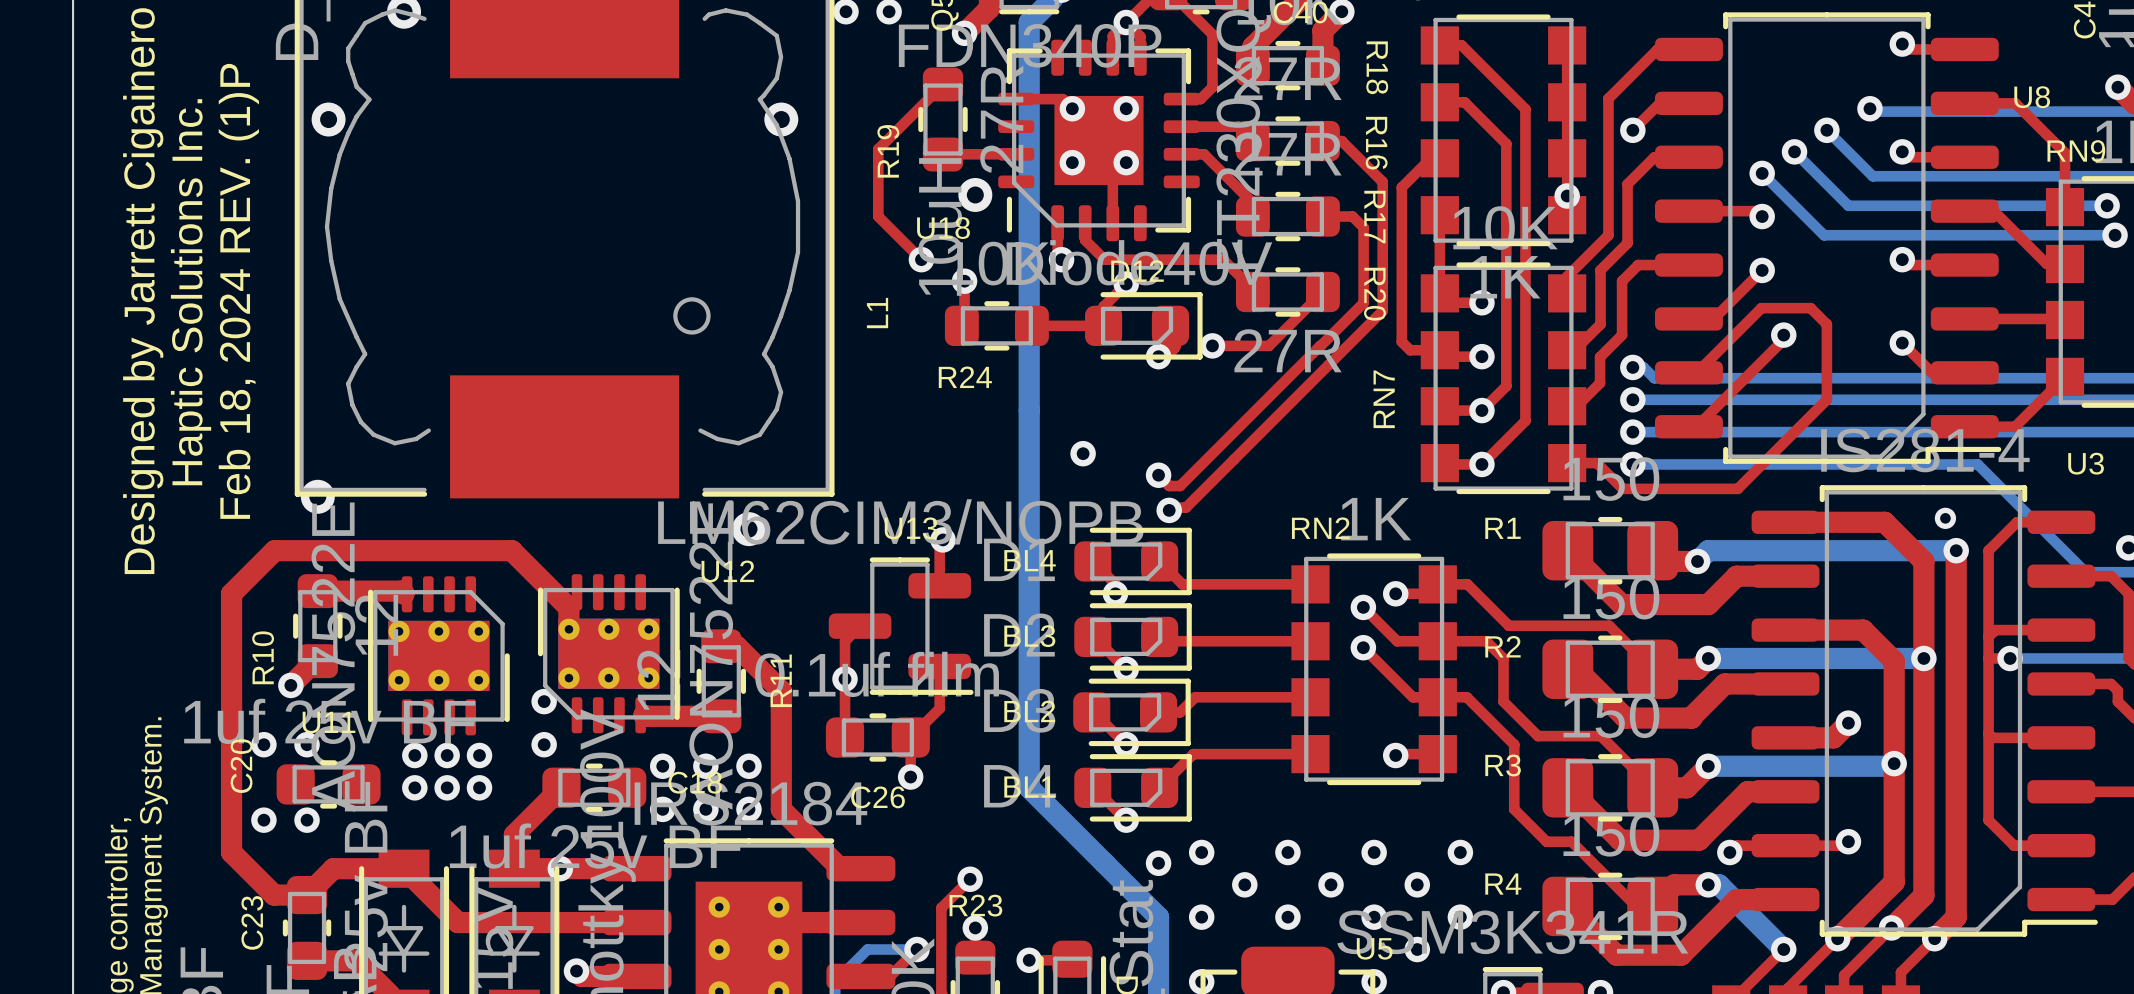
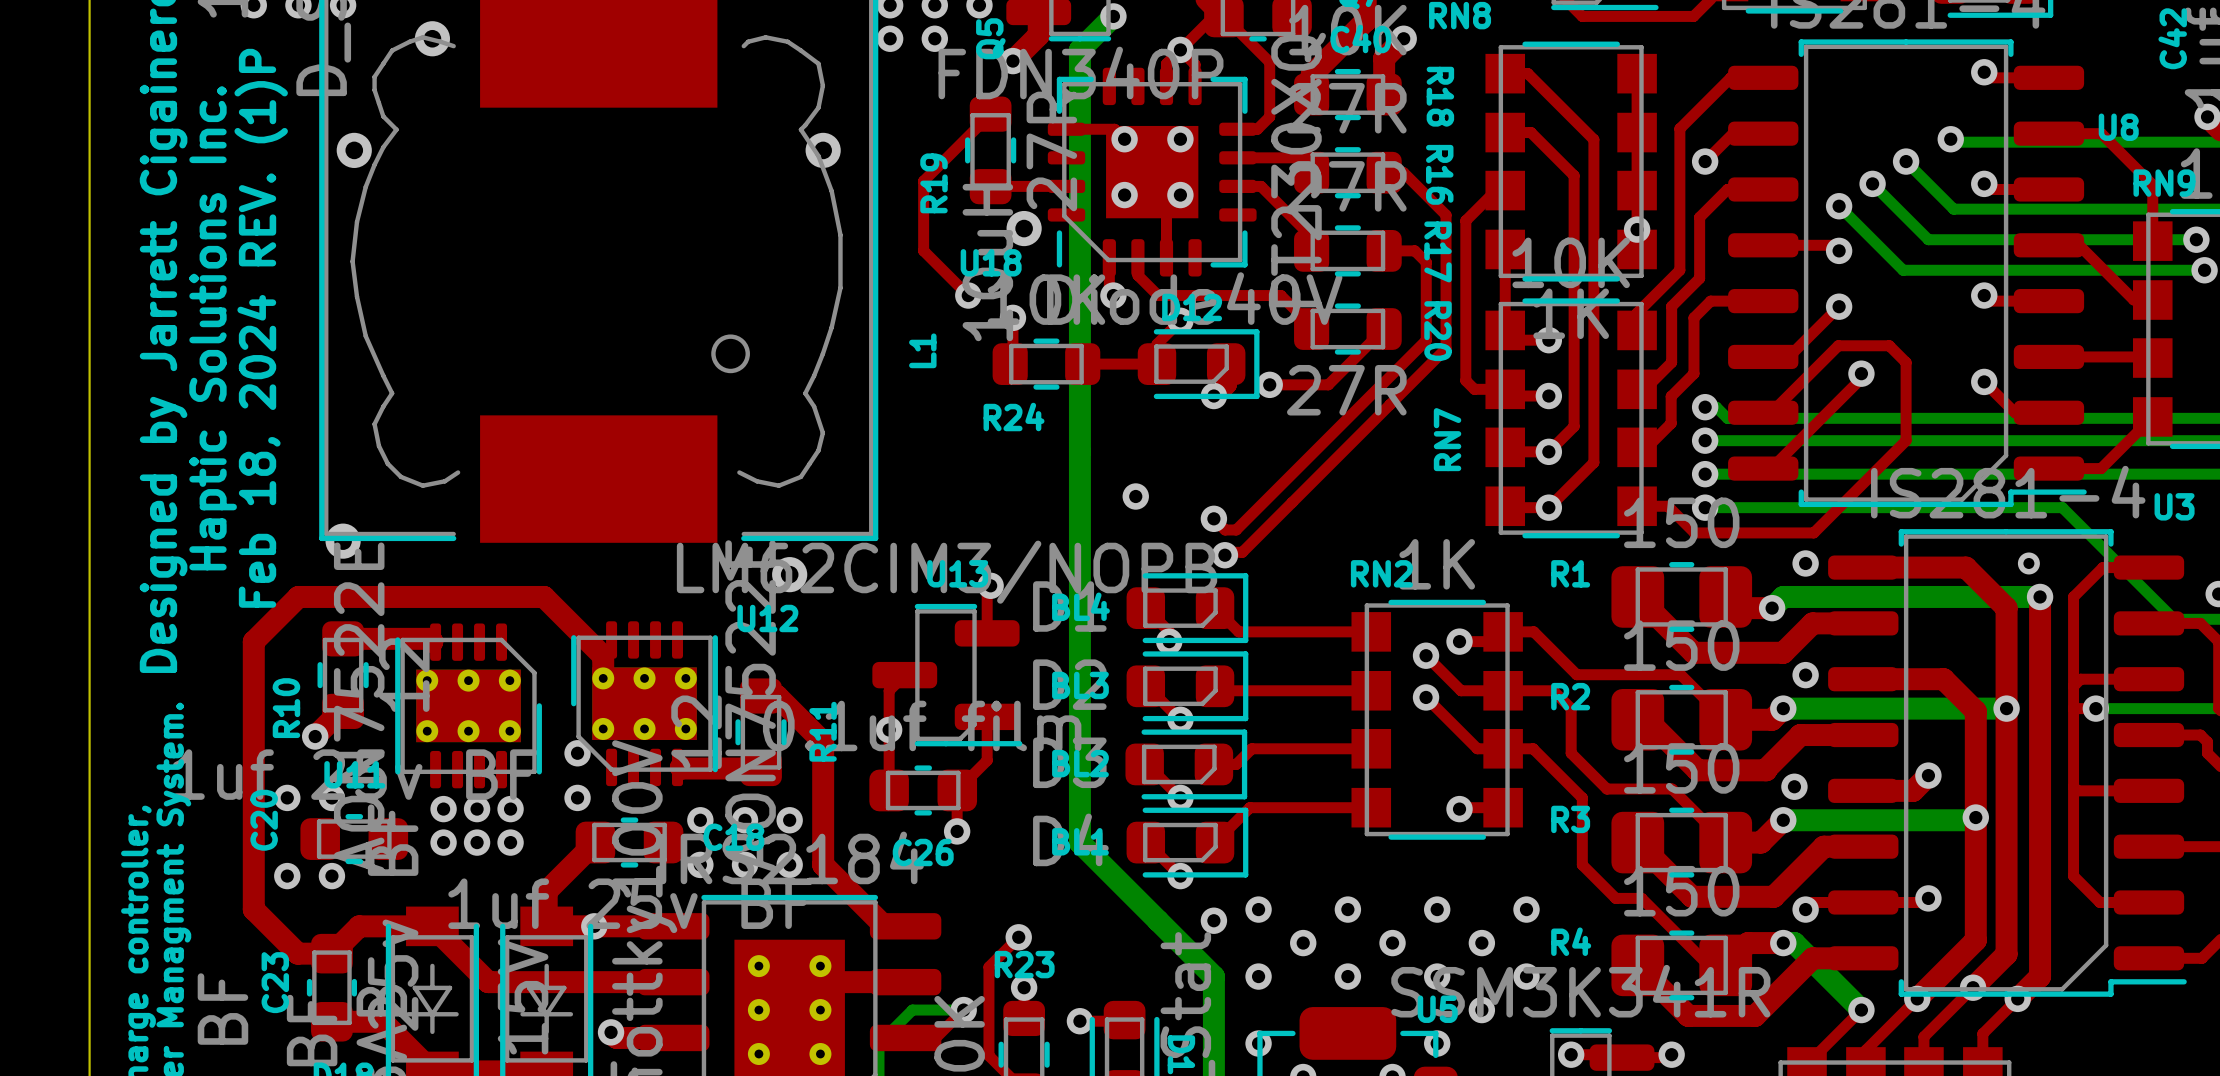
via: none -> (1805, 563)
via: none -> (1805, 675)
via: none -> (1794, 786)

